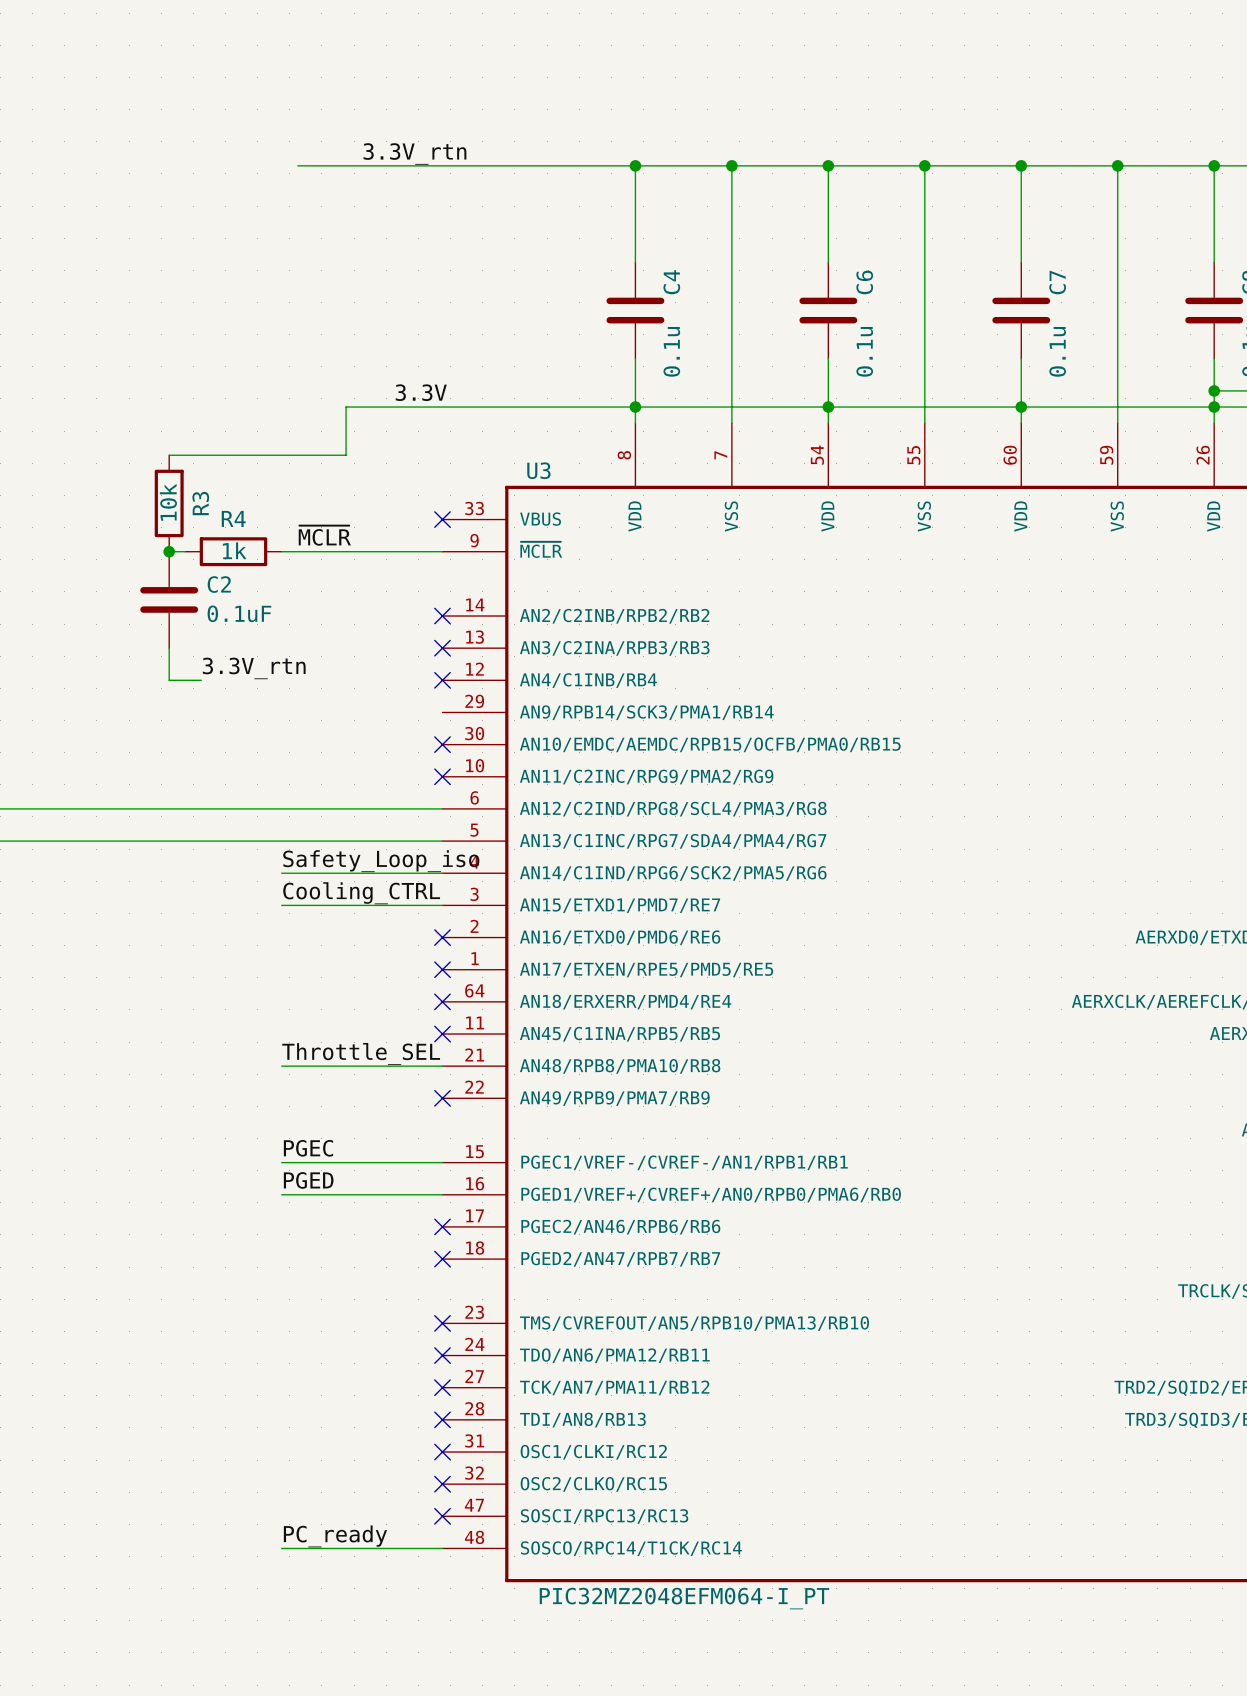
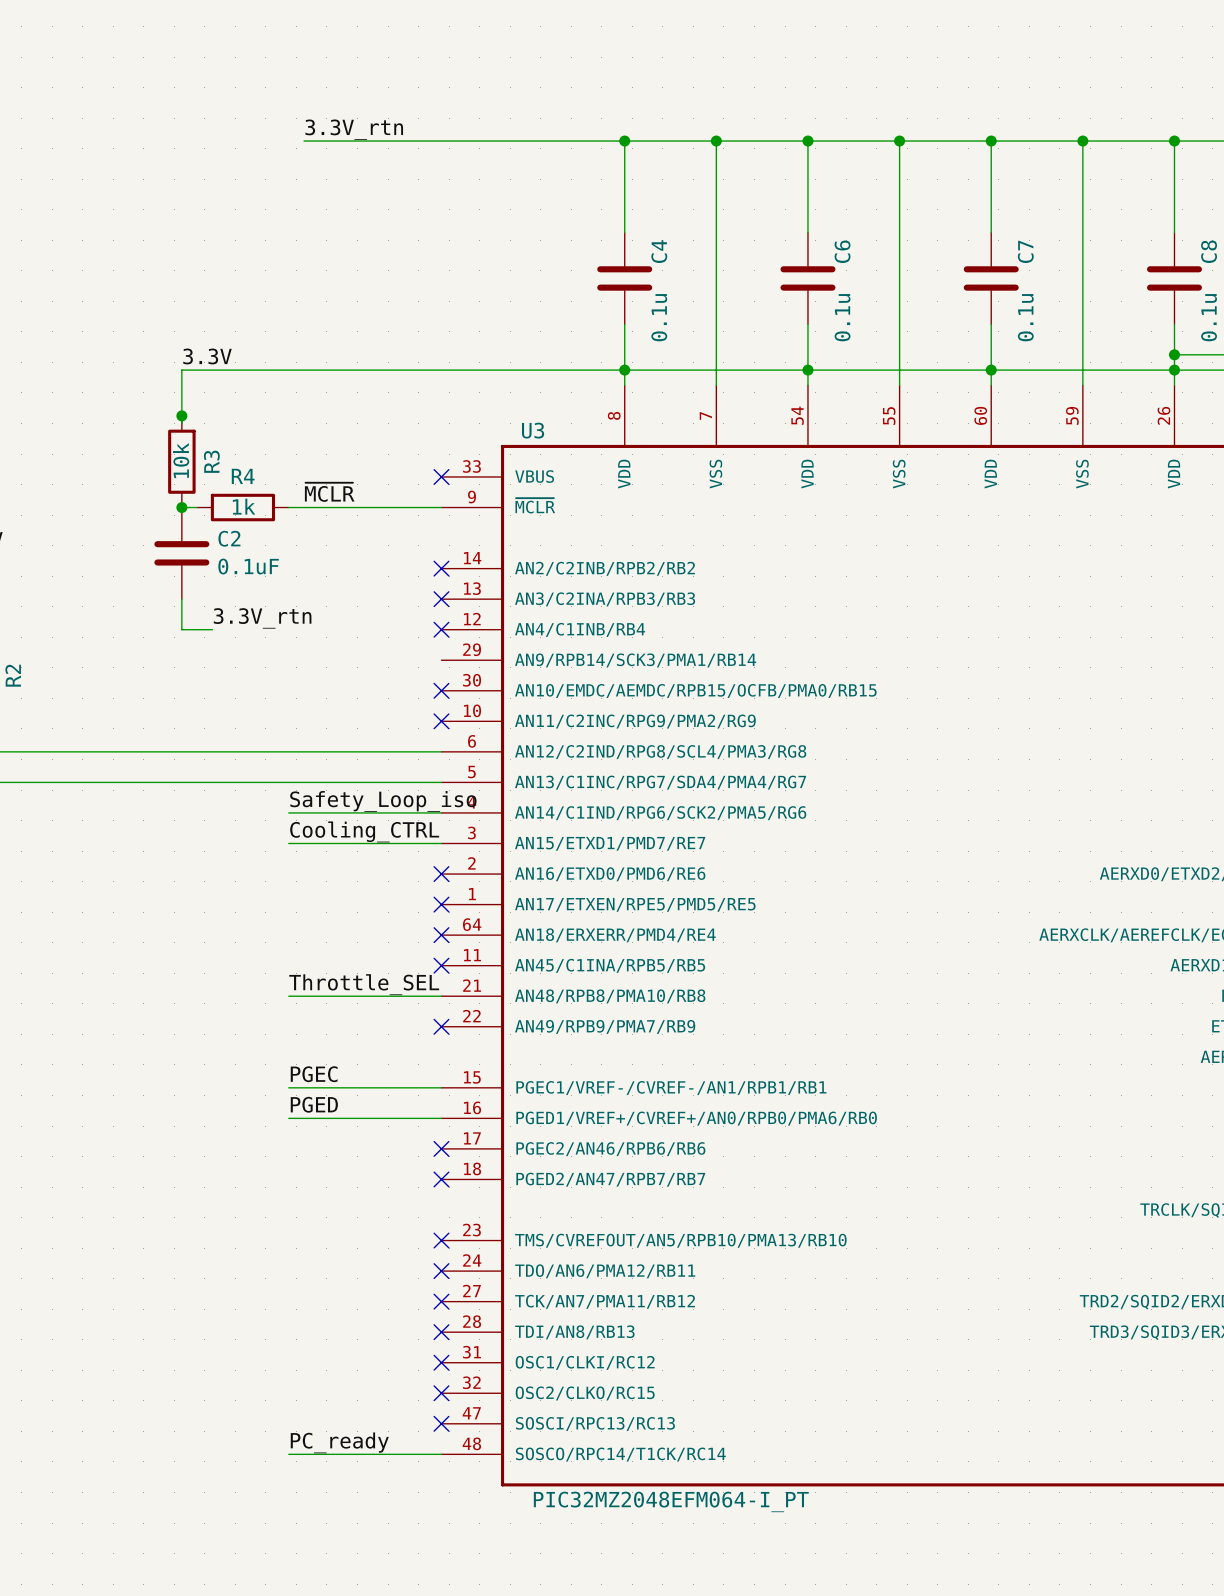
label position: 3.3V_rtn (414, 153) -> 3.3V_rtn (354, 129)
label position: 3.3V (421, 392) -> 3.3V (207, 356)
wire: (346, 407) (346, 455) (169, 455) -> (349, 370) (181, 370) (181, 423)
junction: none -> (181, 415)

